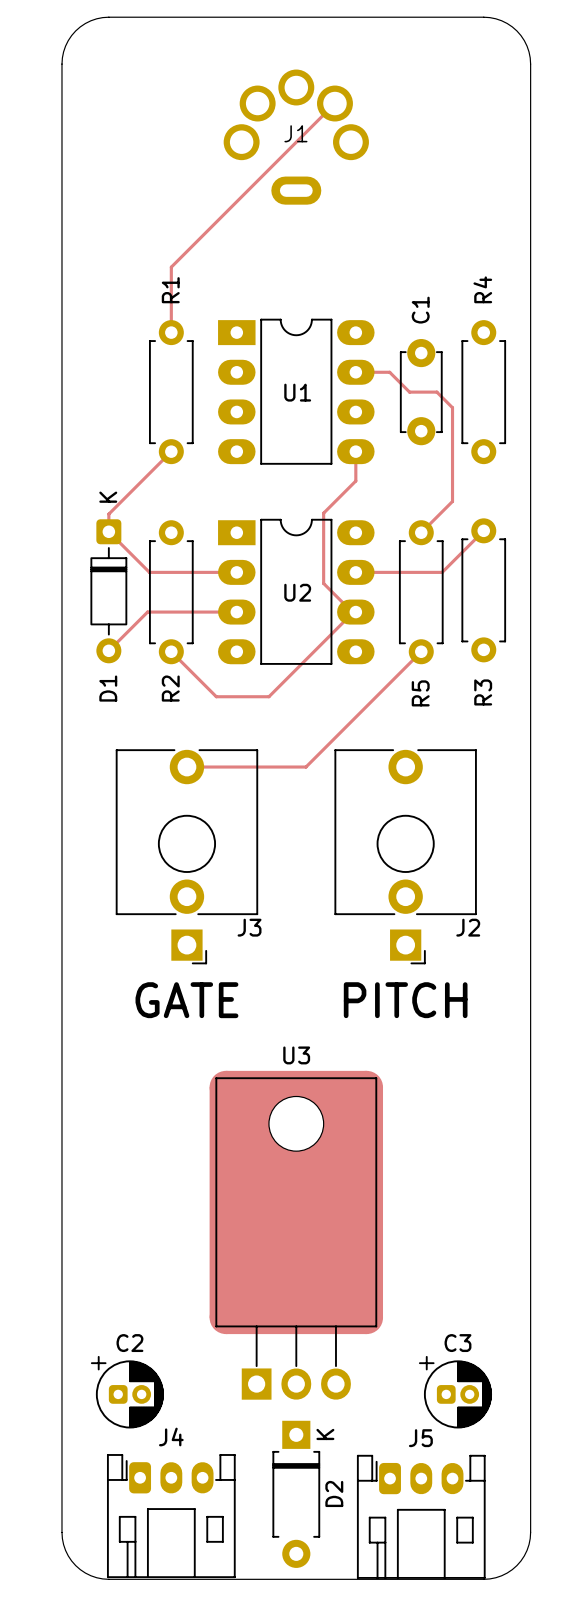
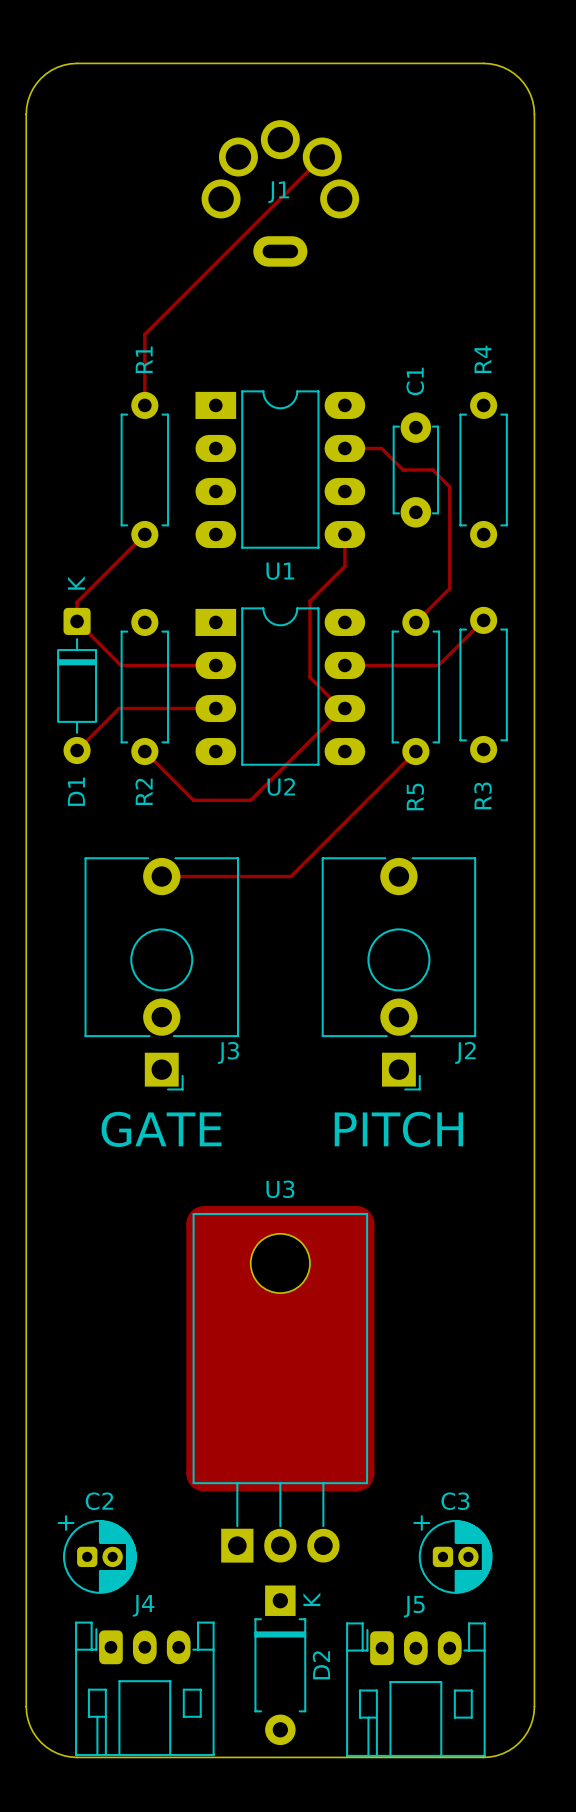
U1 name position: U1 (297, 392) -> U1 (280, 571)
U2 name position: U2 (297, 592) -> U2 (281, 786)

